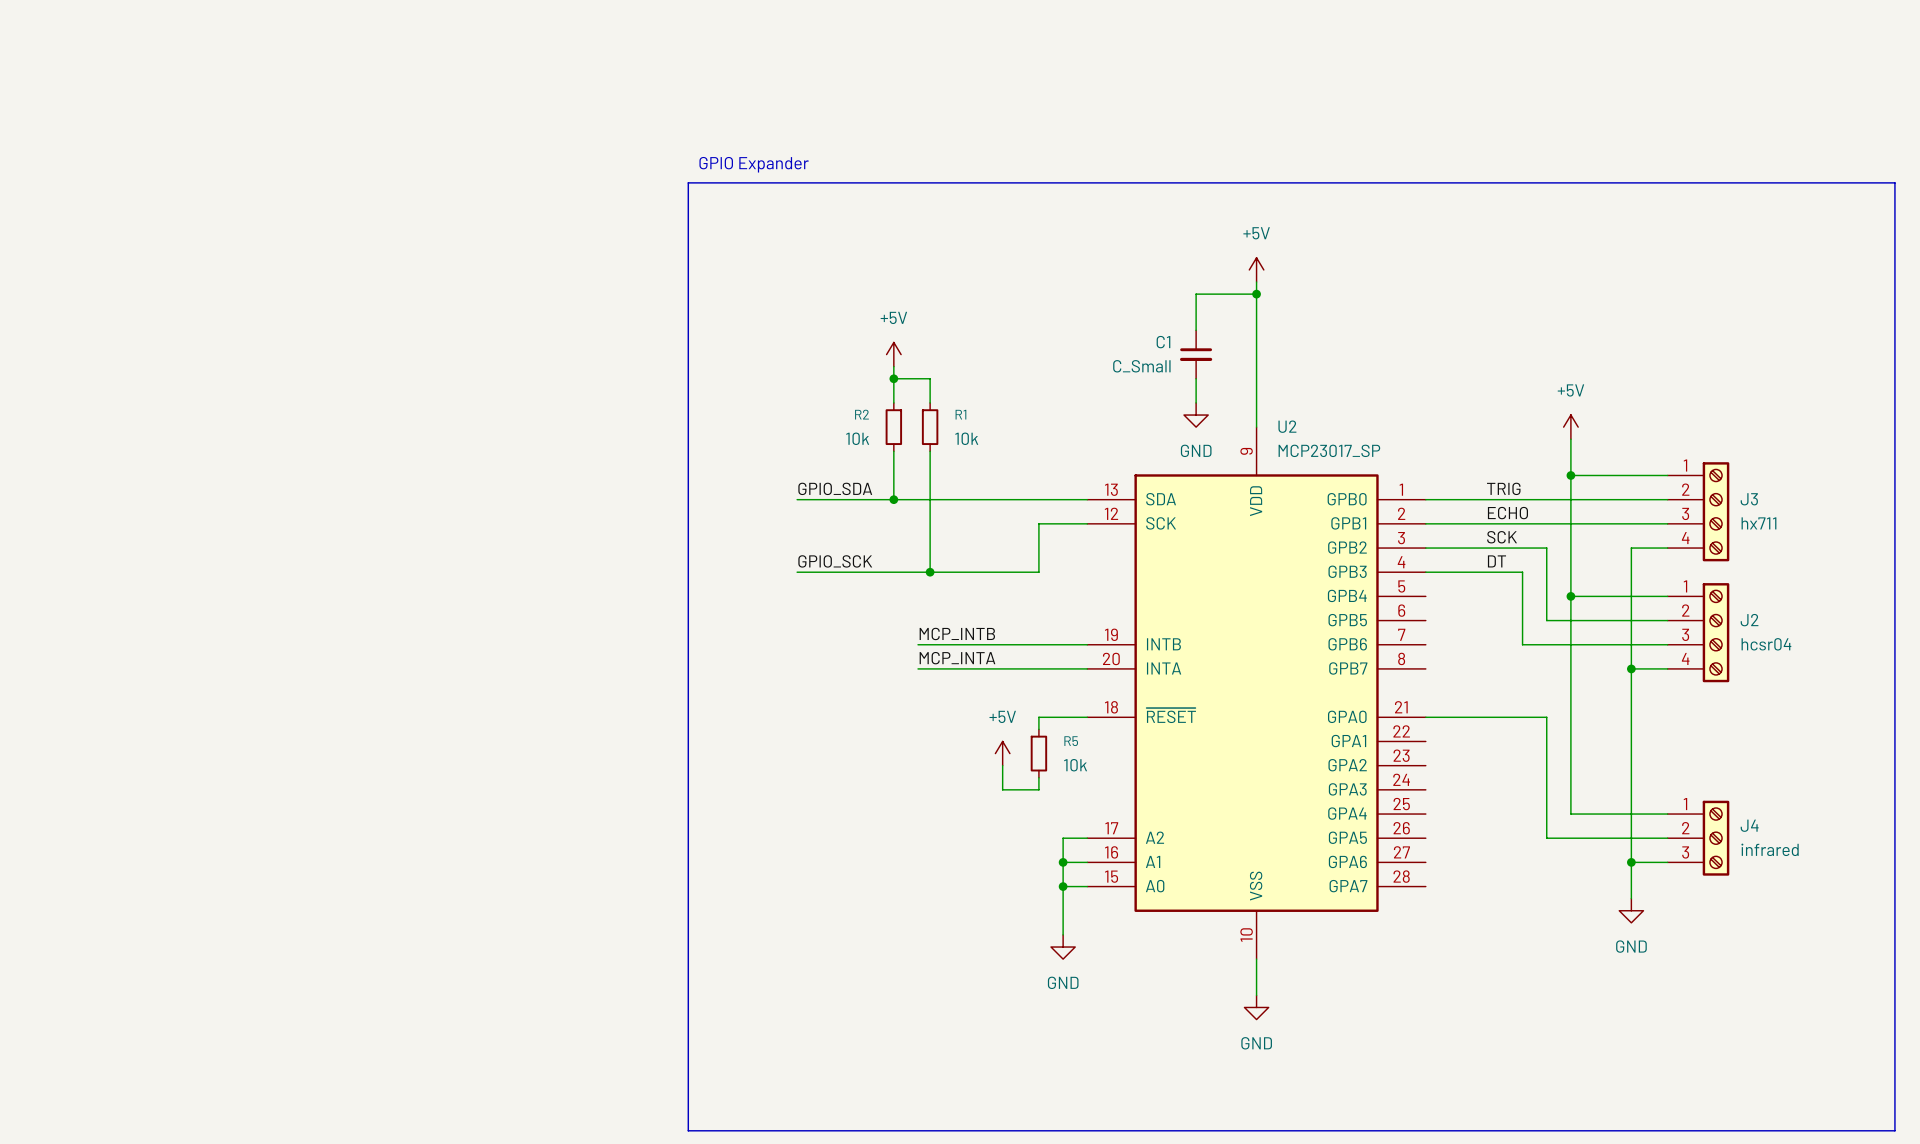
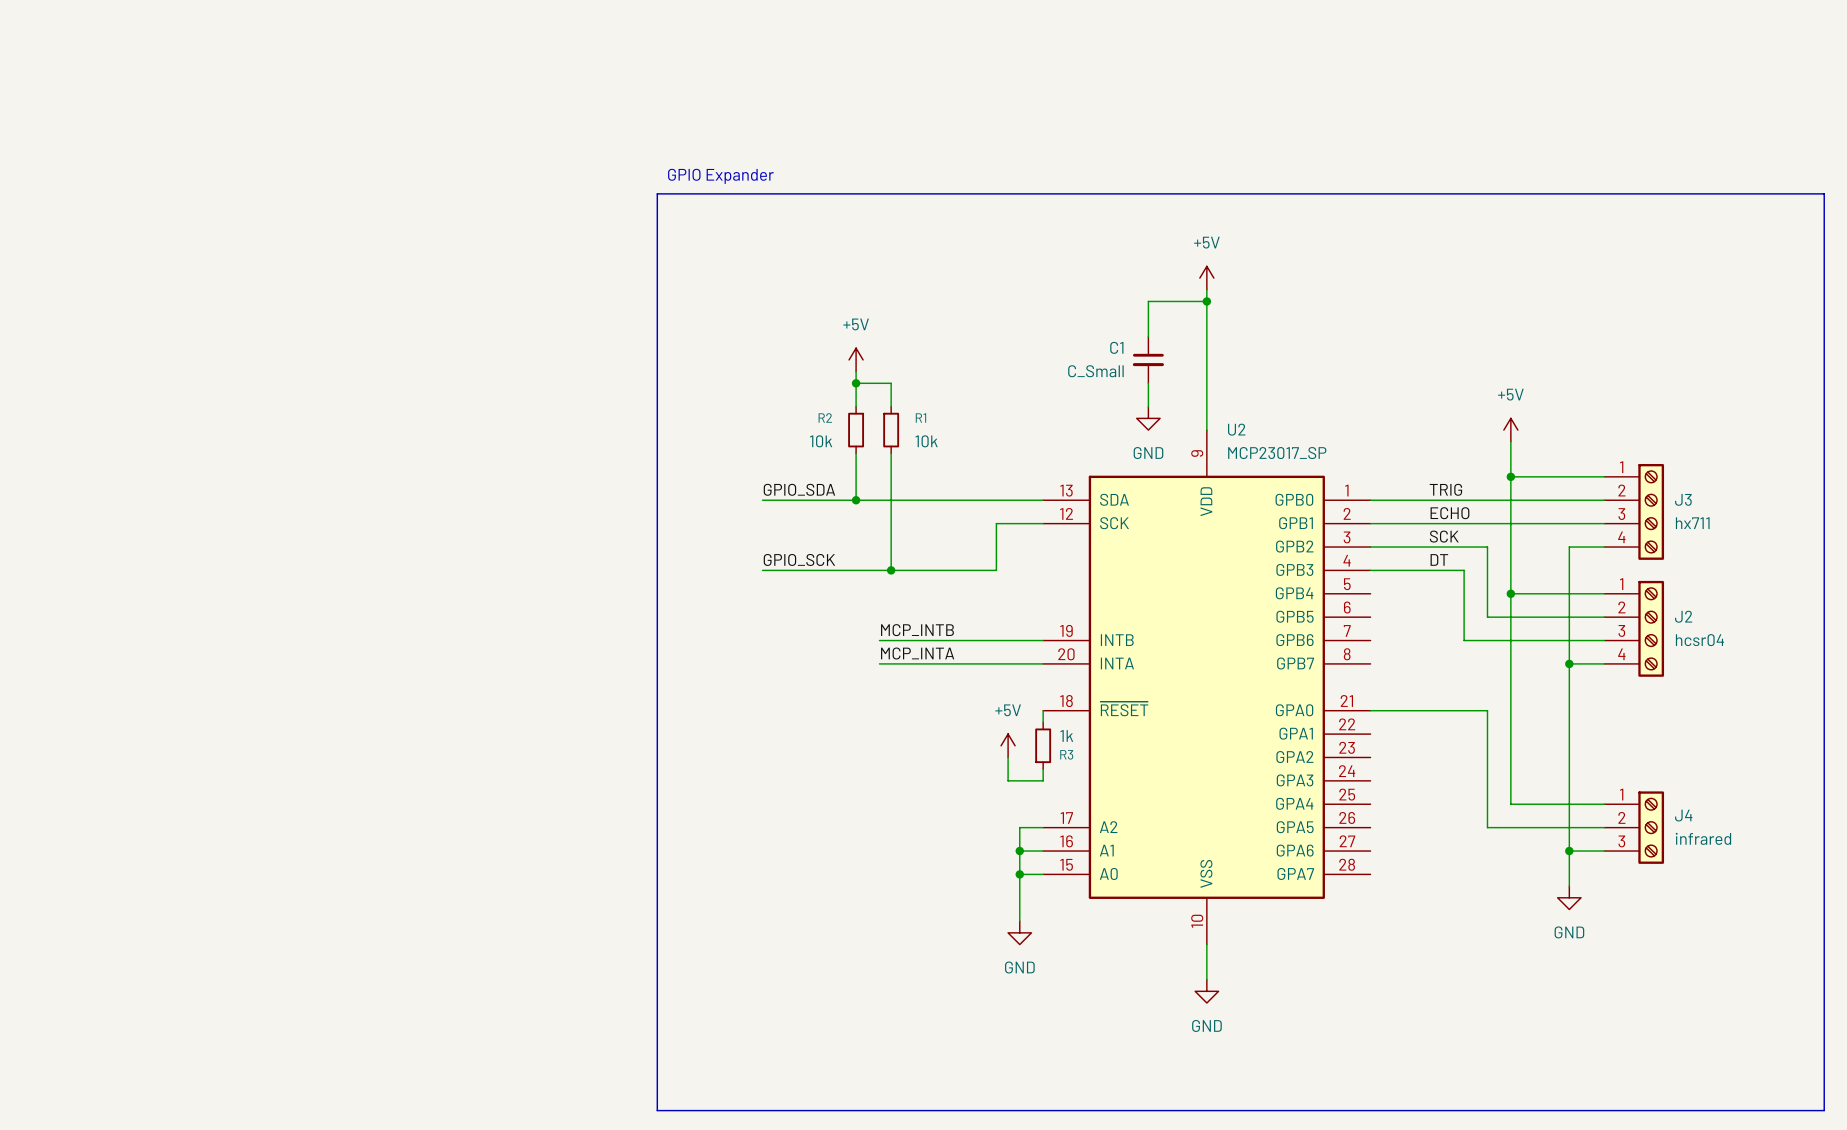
wire: (1087, 717) (1038, 717) (1038, 729) -> (1043, 710) (1043, 722)
power symbol position: +5V (1002, 753) -> +5V (1008, 745)
R5: 10k (1038, 753) -> none
R3: none -> 1k (1043, 745)
wire: (1002, 765) (1002, 789) (1038, 789) (1038, 777) -> (1008, 757) (1008, 780) (1043, 780) (1043, 769)

